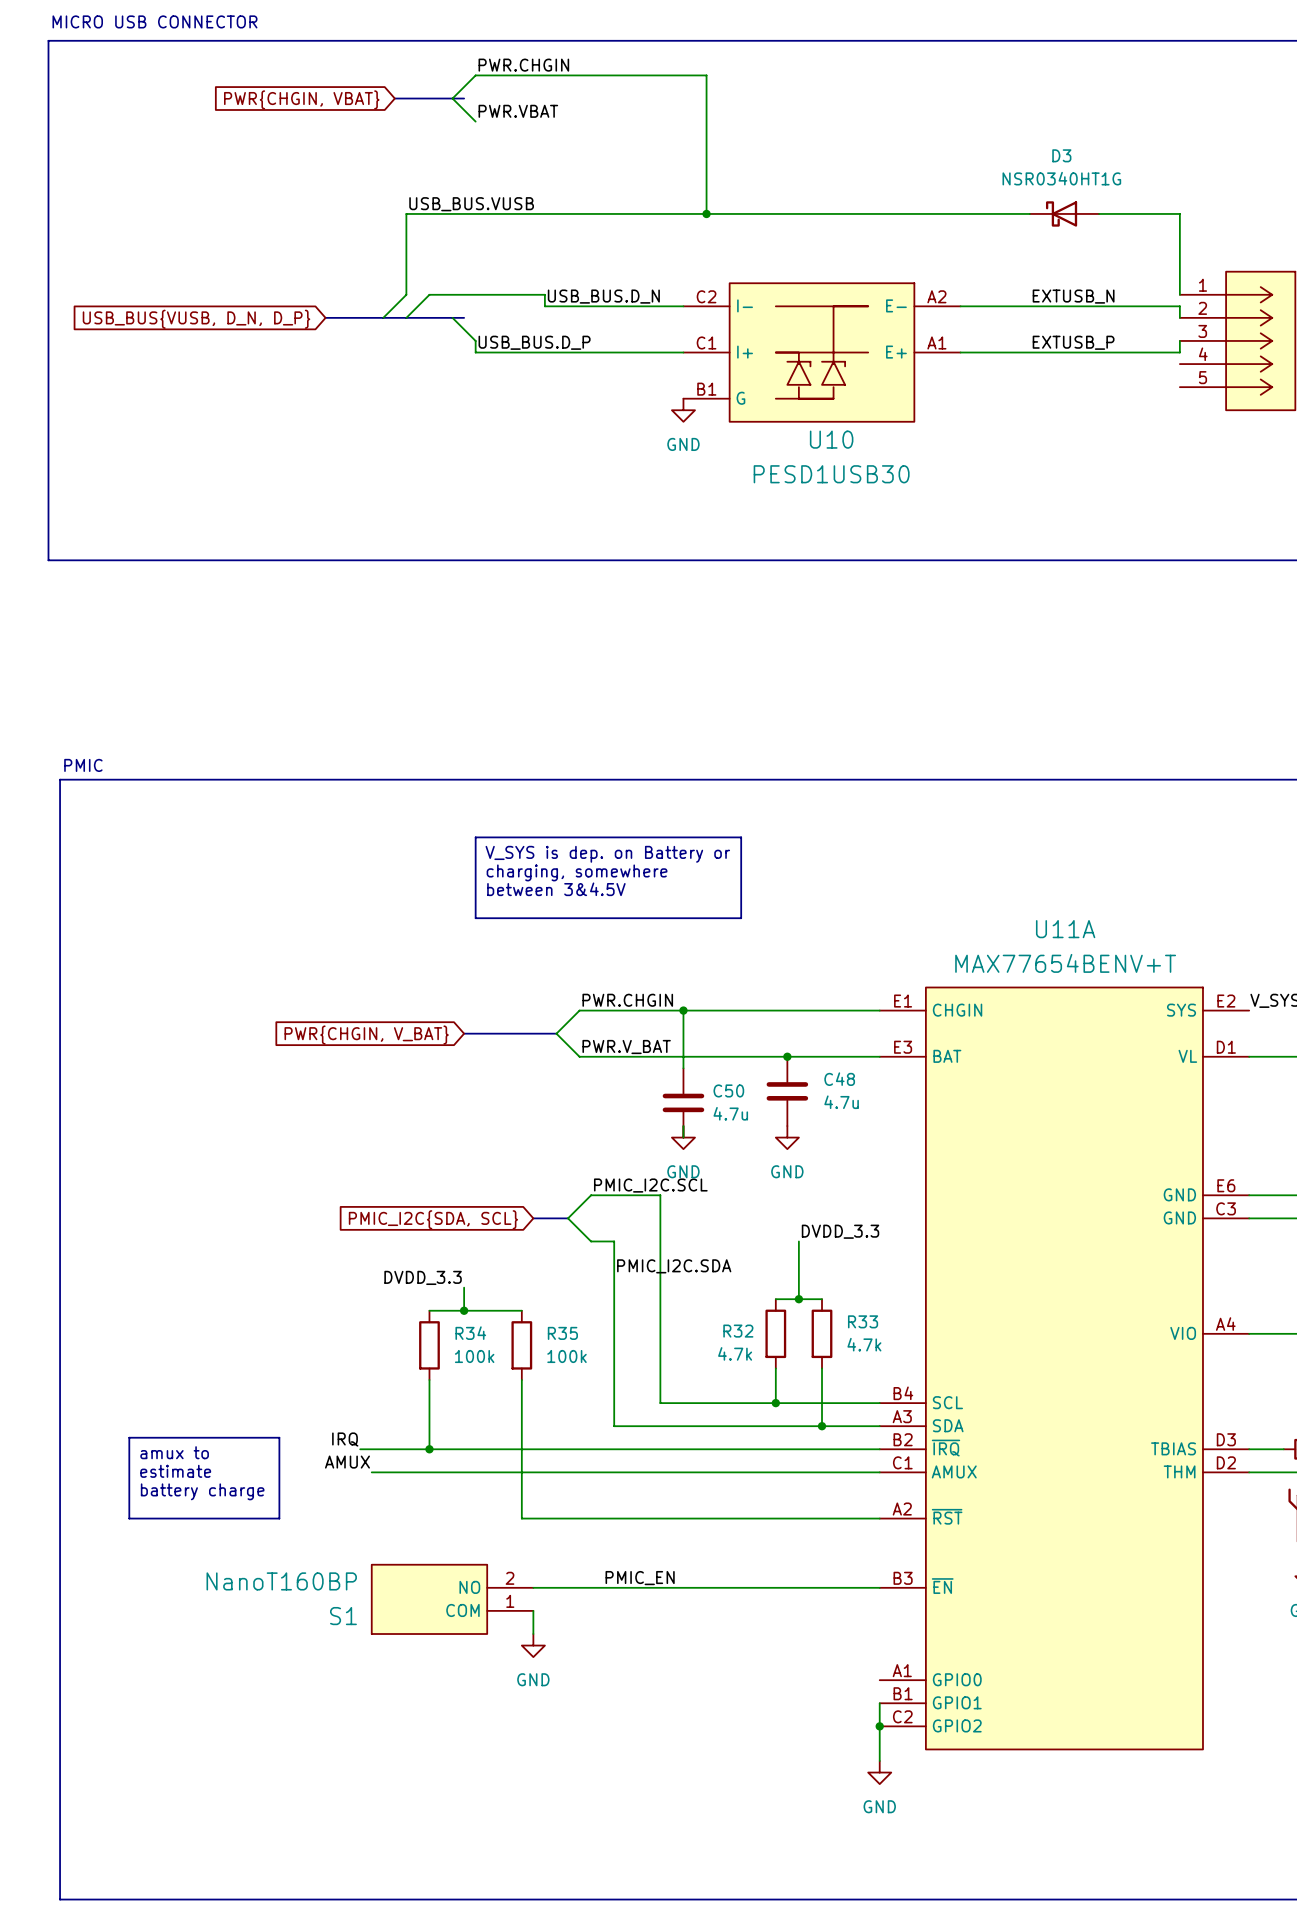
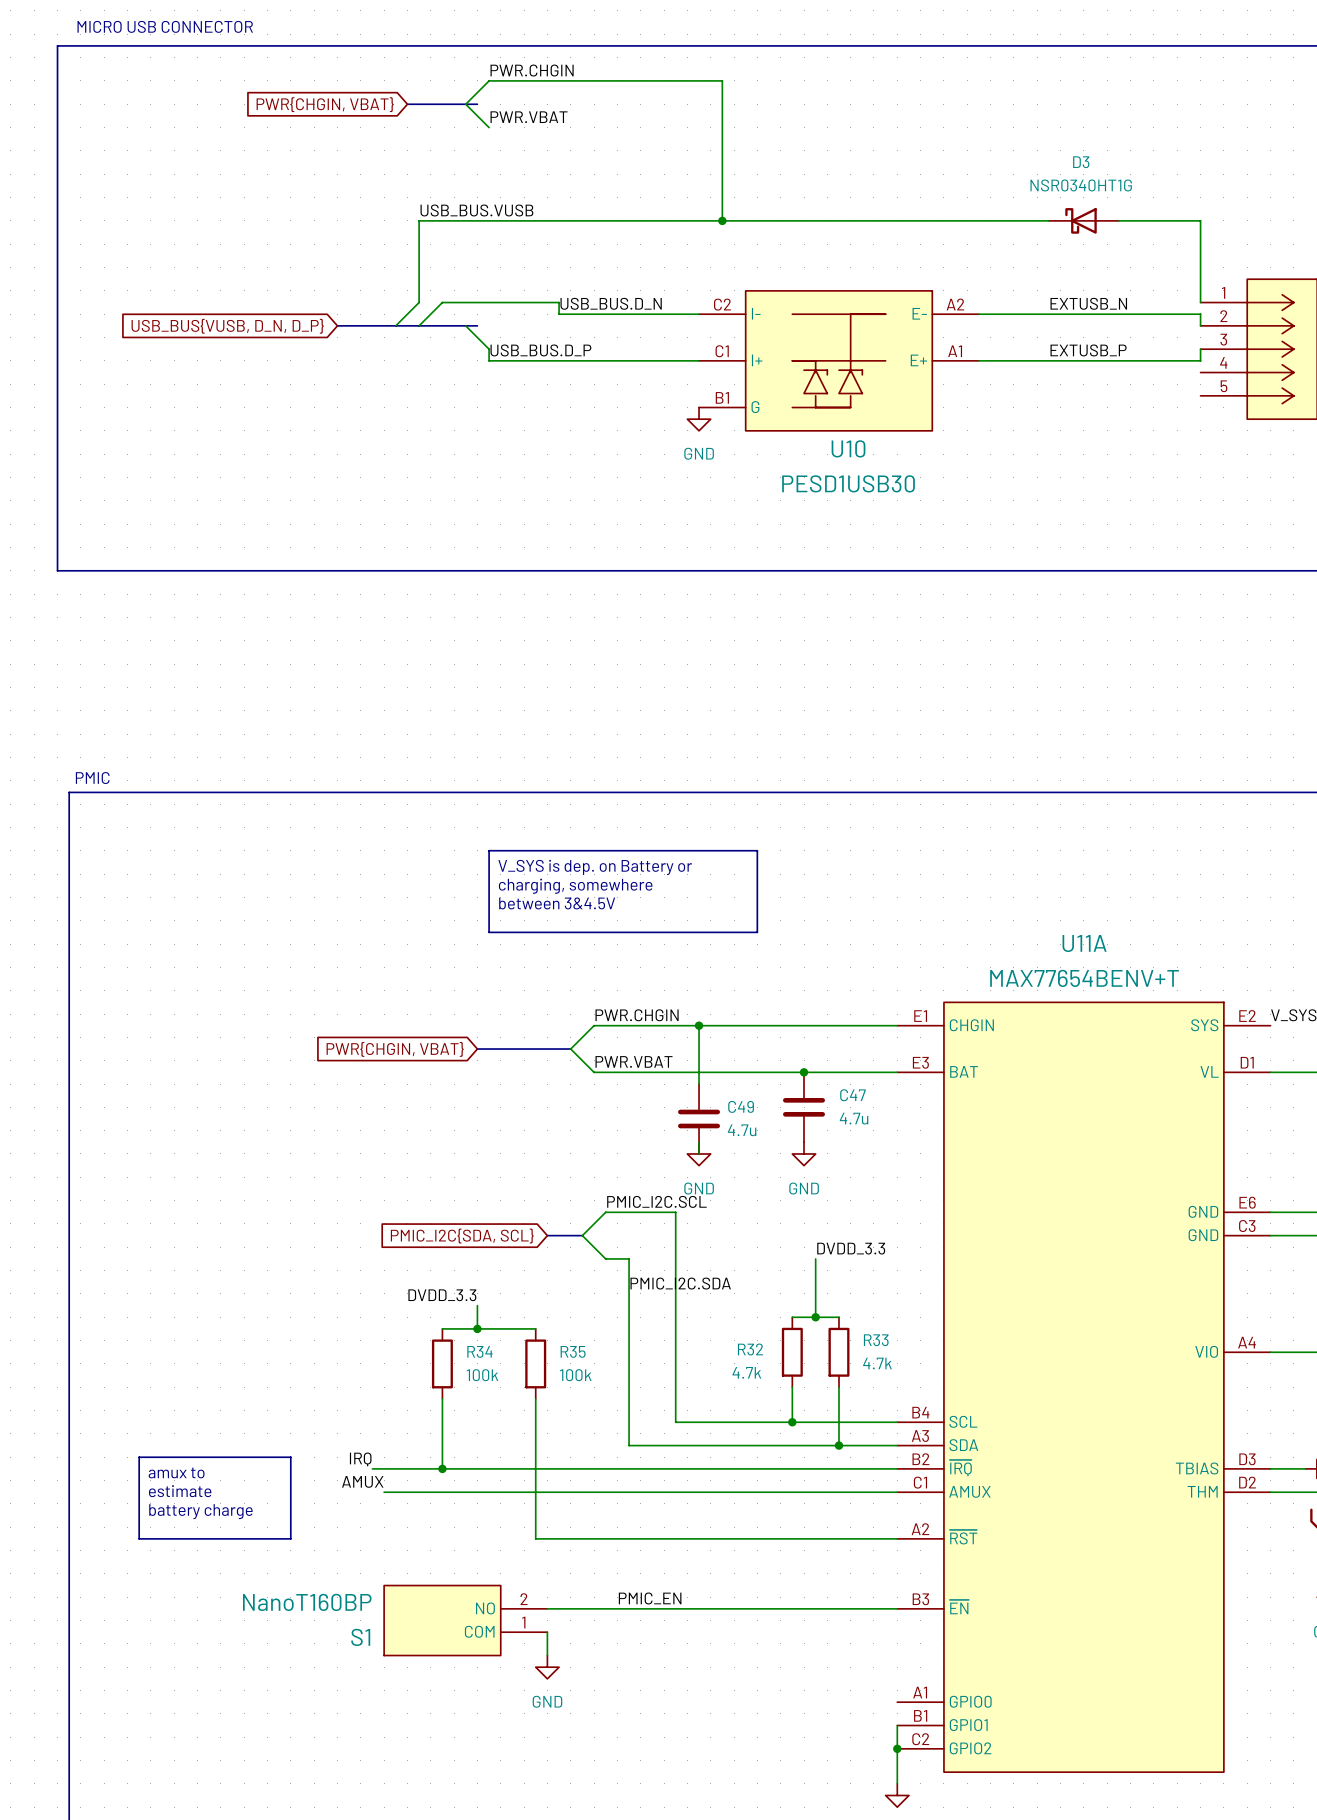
global label: PWR{CHGIN, V_BAT} (366, 1035) -> PWR{CHGIN, VBAT} (395, 1049)
label: PWR.V_BAT (626, 1047) -> PWR.VBAT (634, 1061)
C48 name: C48 (839, 1079) -> C47 (852, 1095)
C50 name: C50 (728, 1090) -> C49 (741, 1106)

